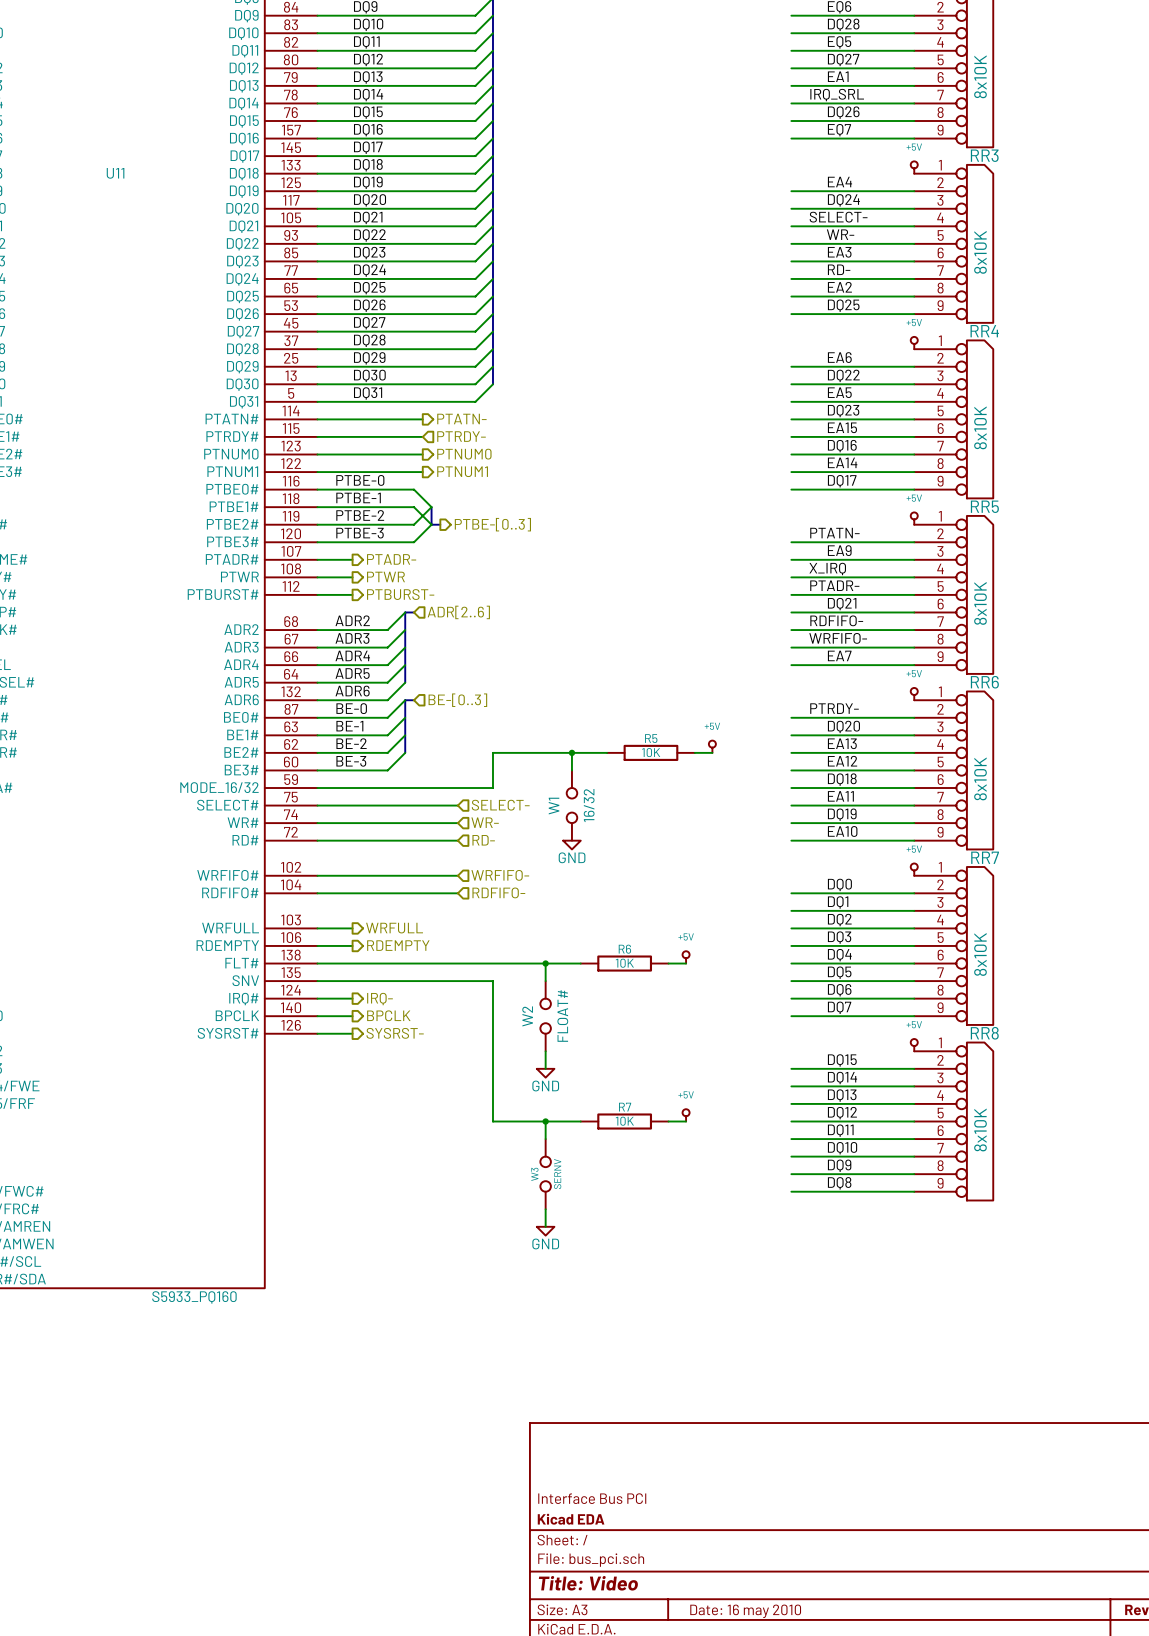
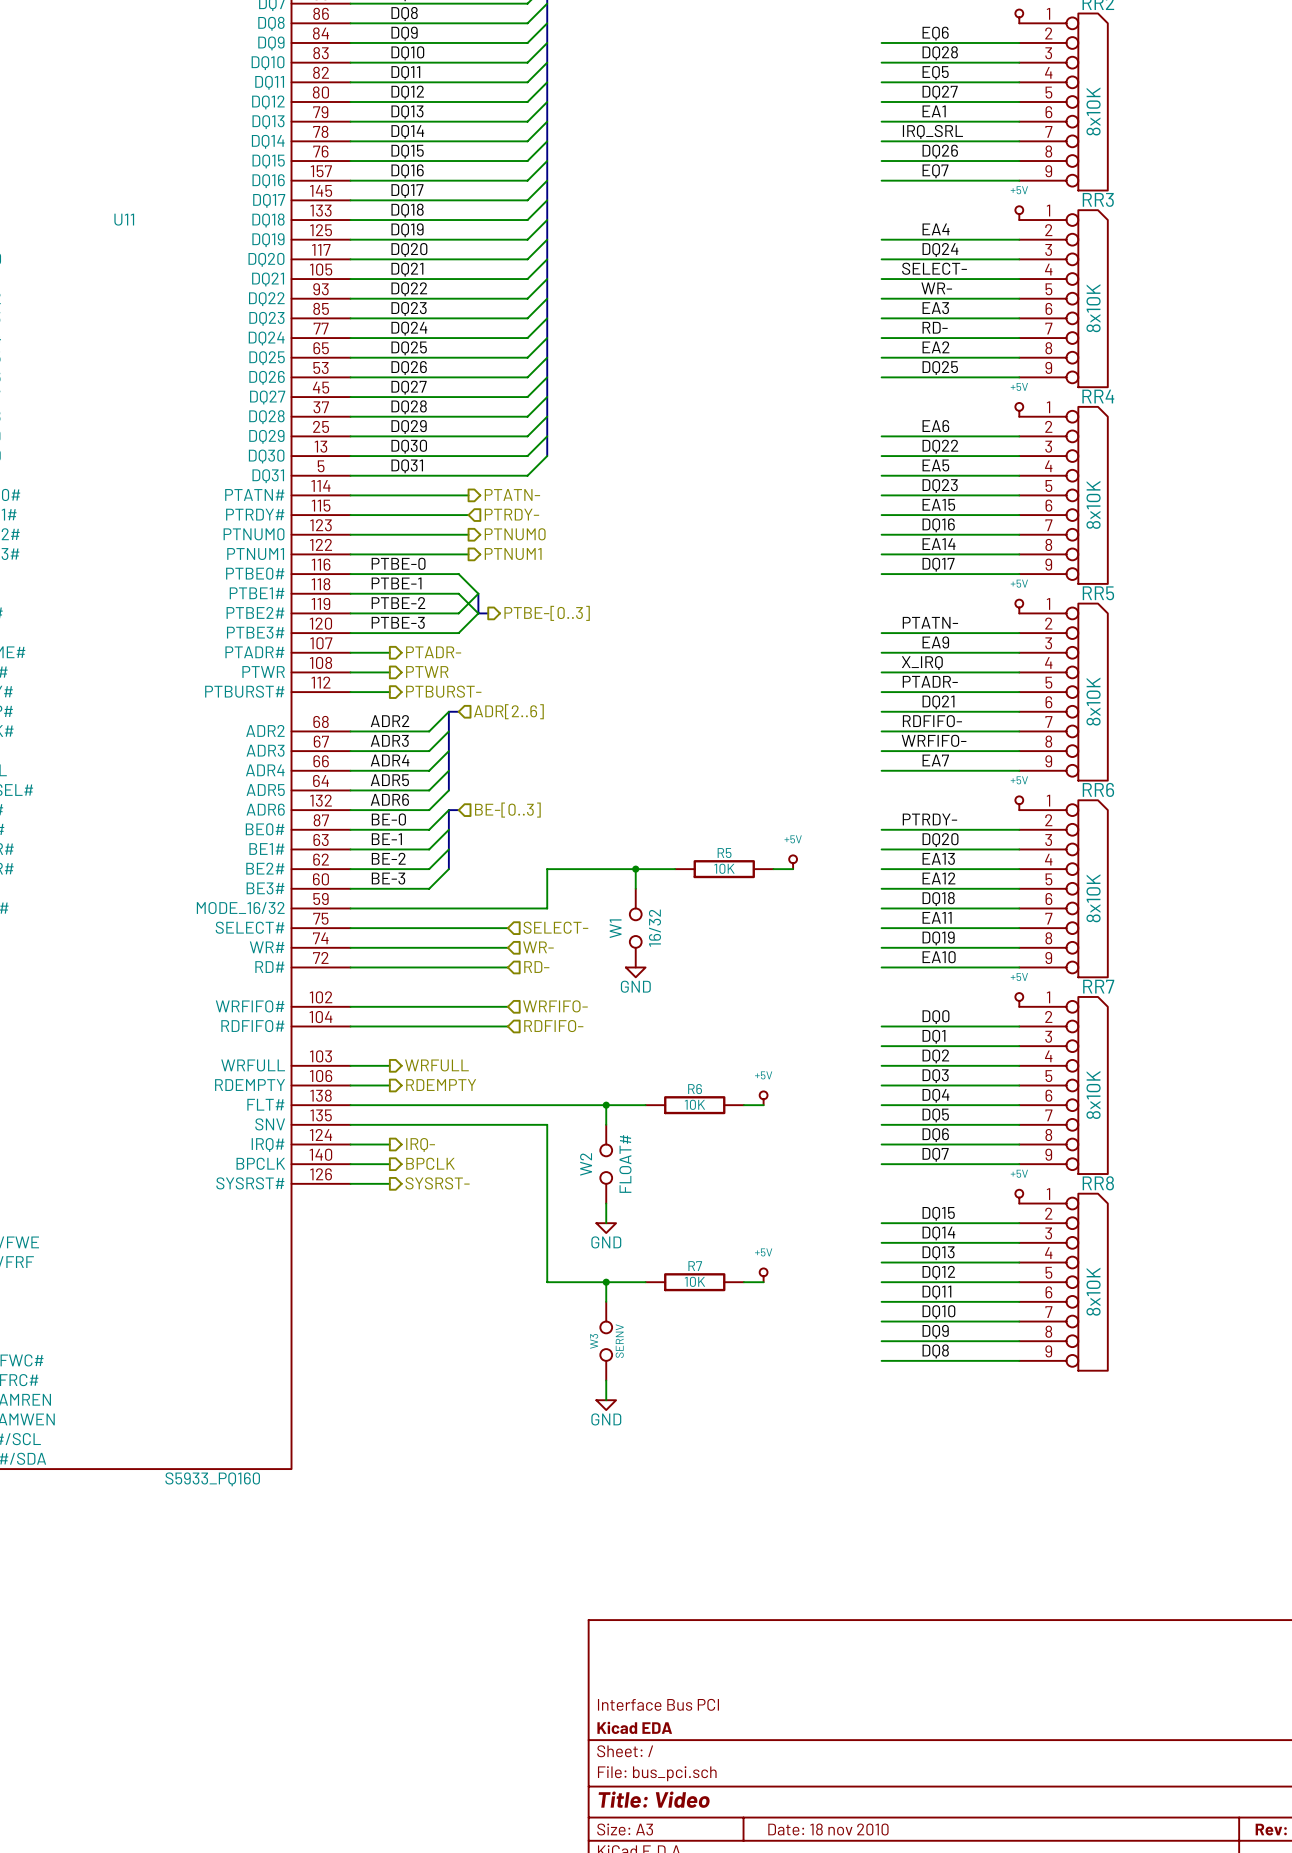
title block: Date: 16 may 2010 (745, 1611) -> Date: 18 nov 2010 (828, 1829)

